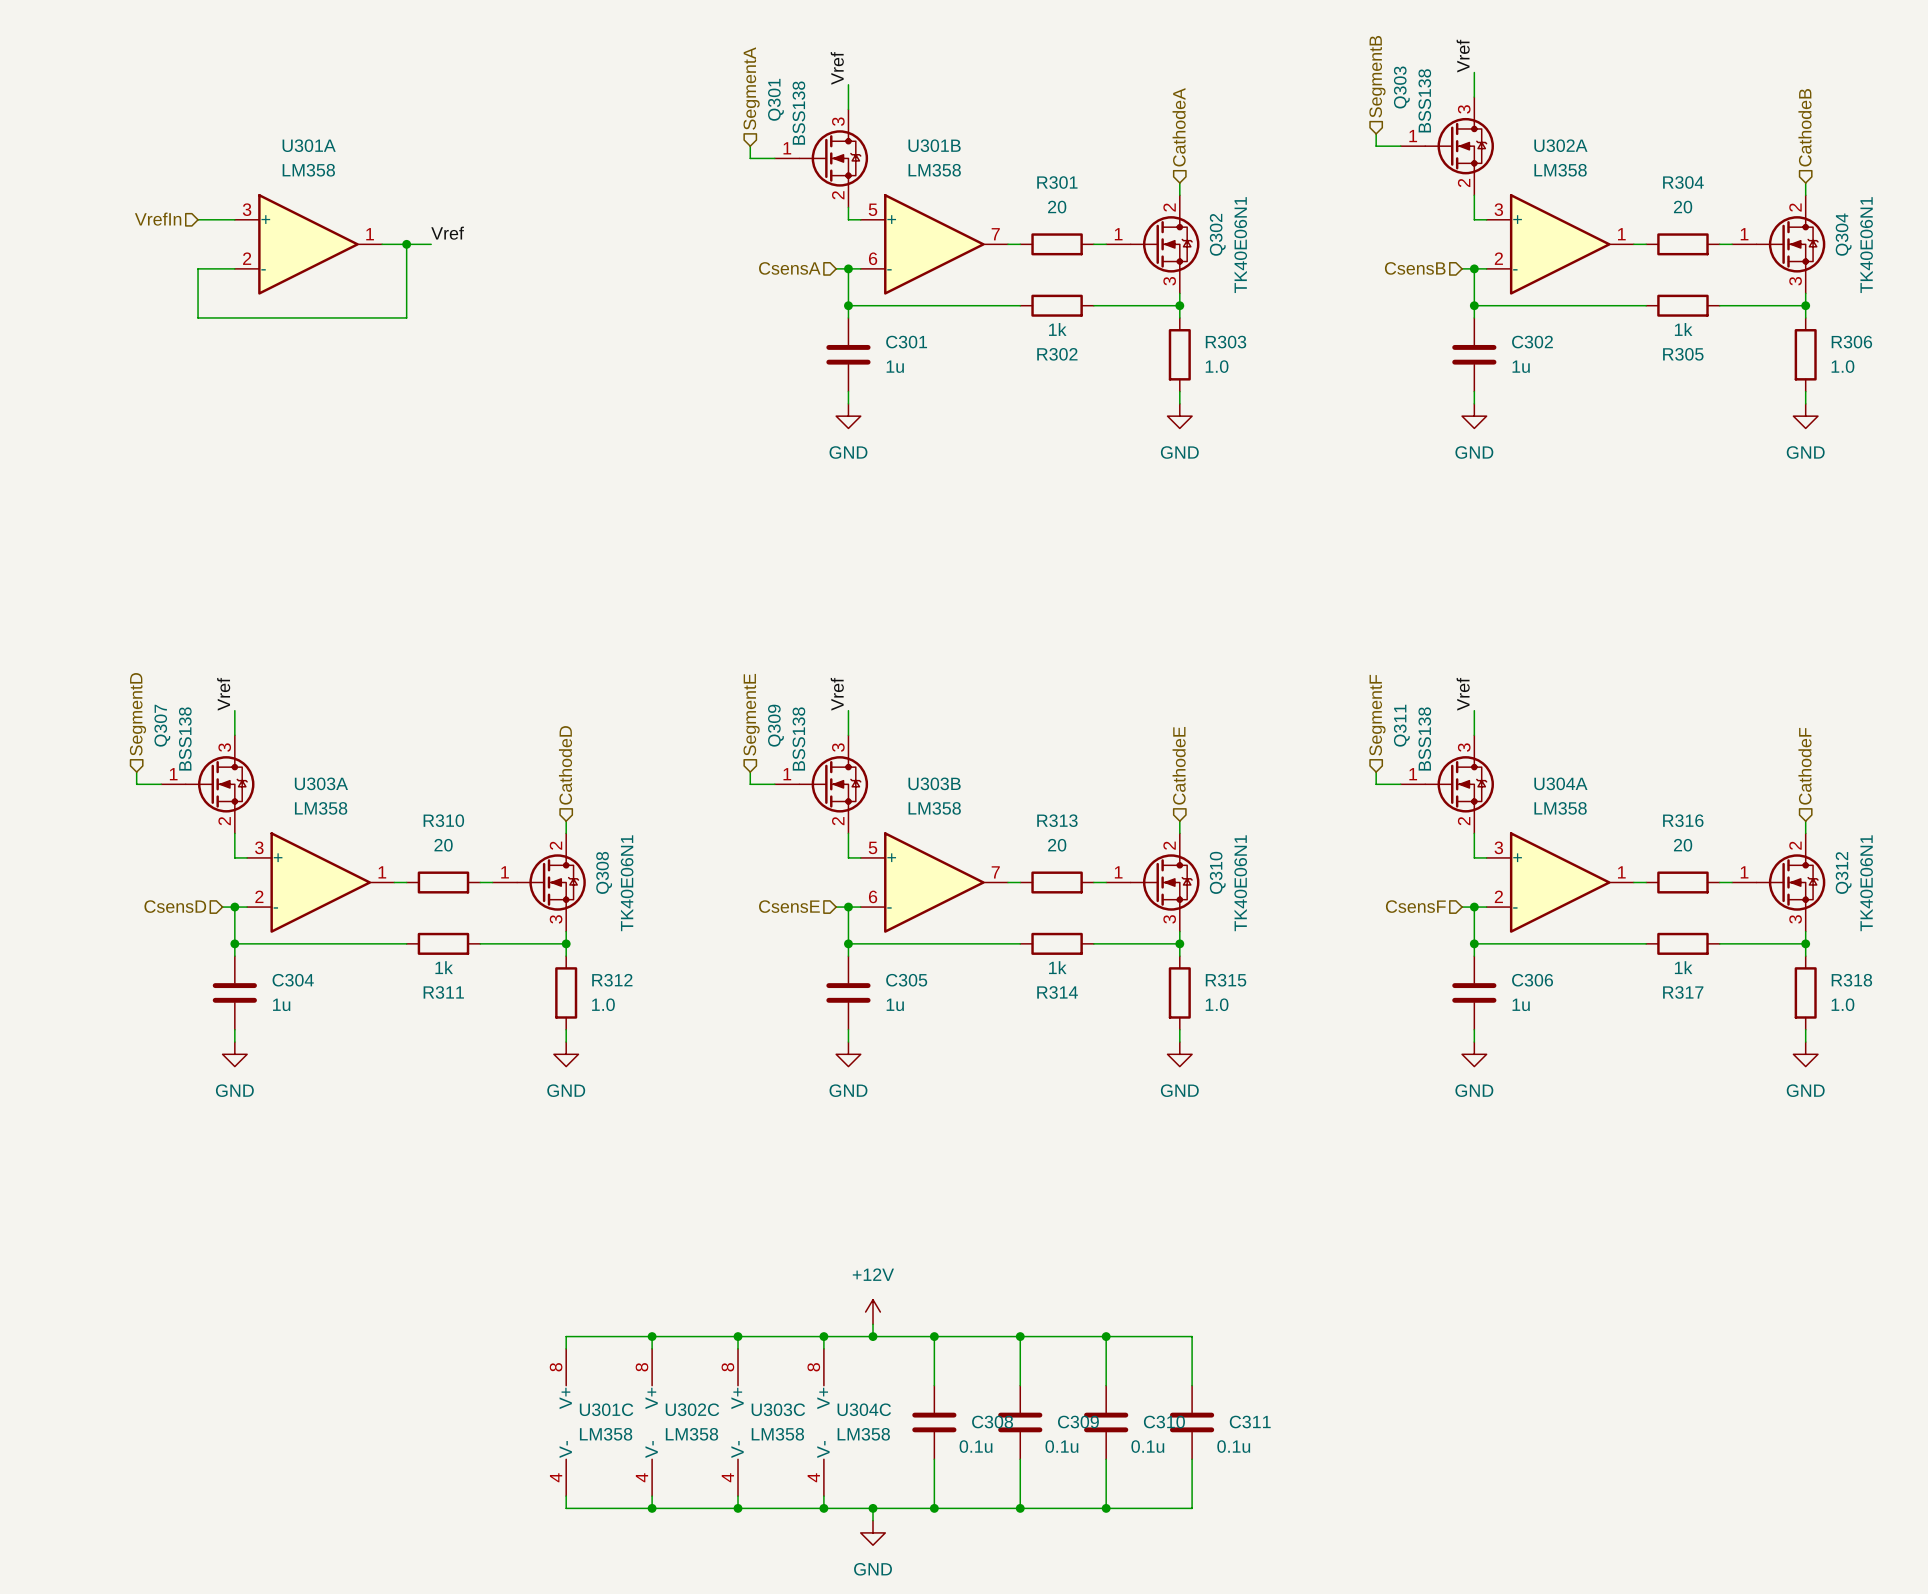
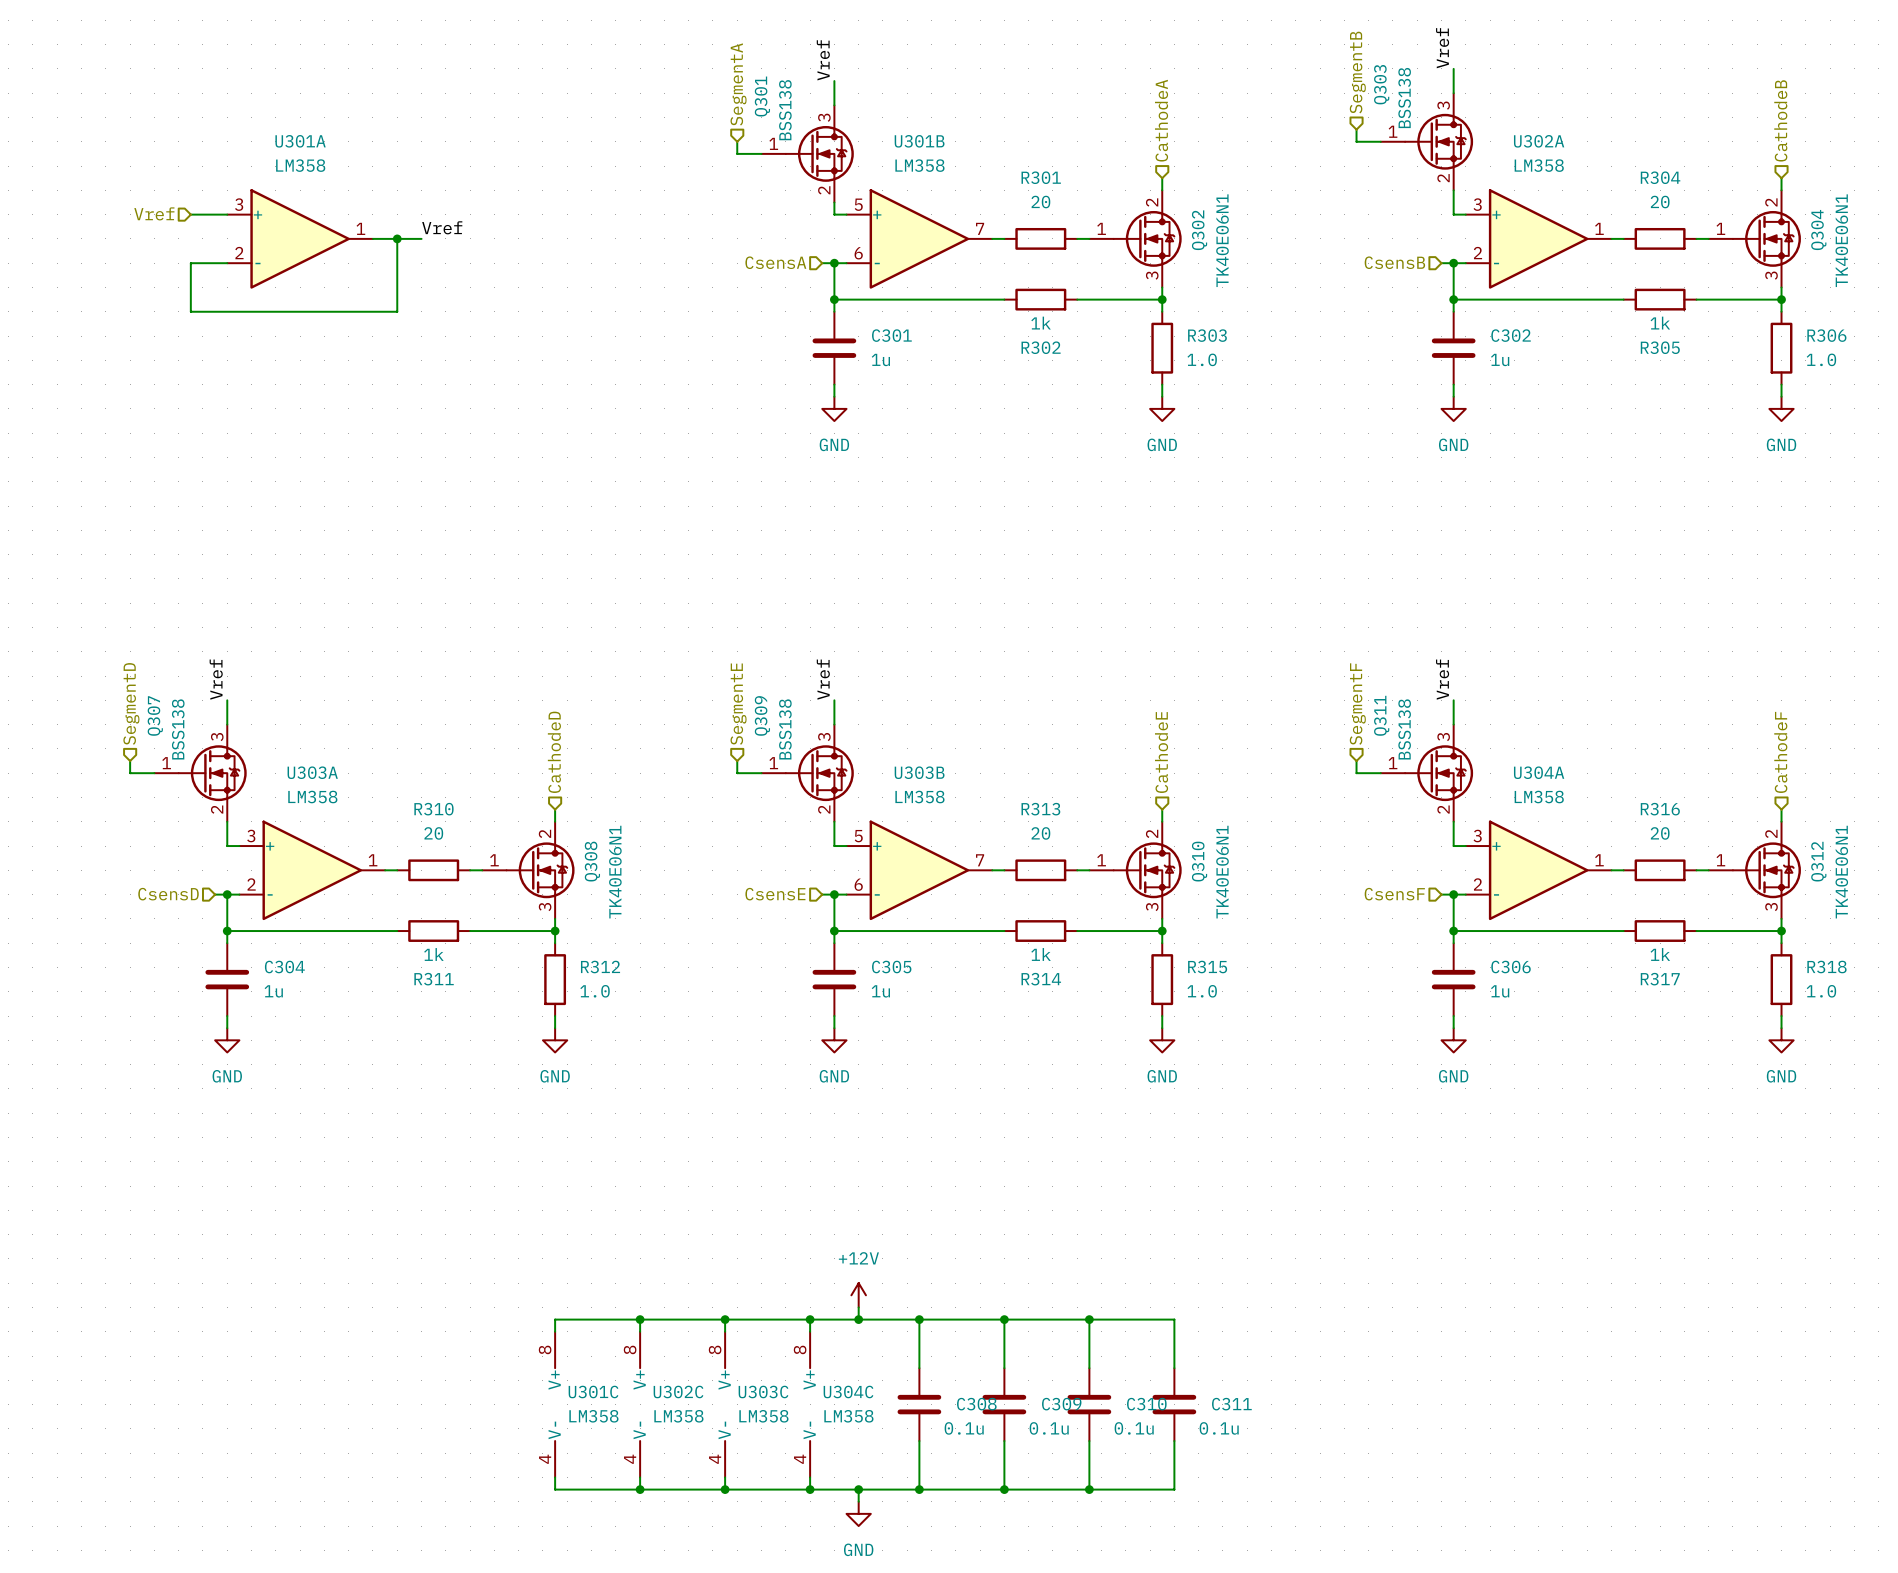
hierarchical label: VrefIn (158, 219) -> Vref (154, 213)

